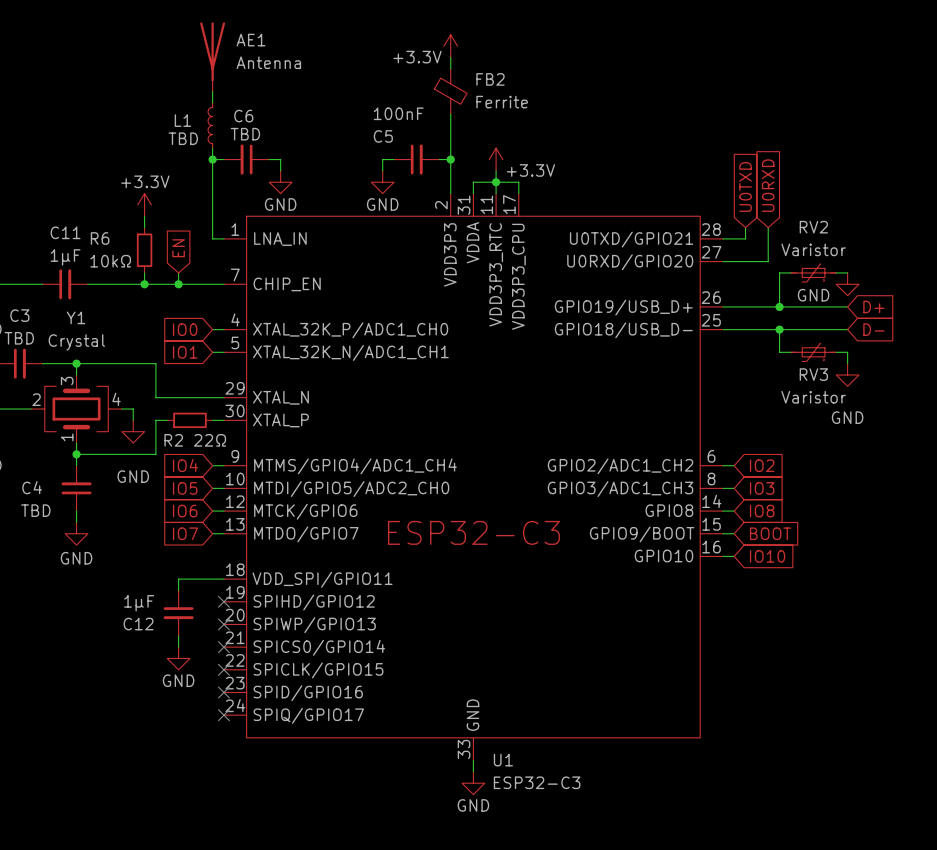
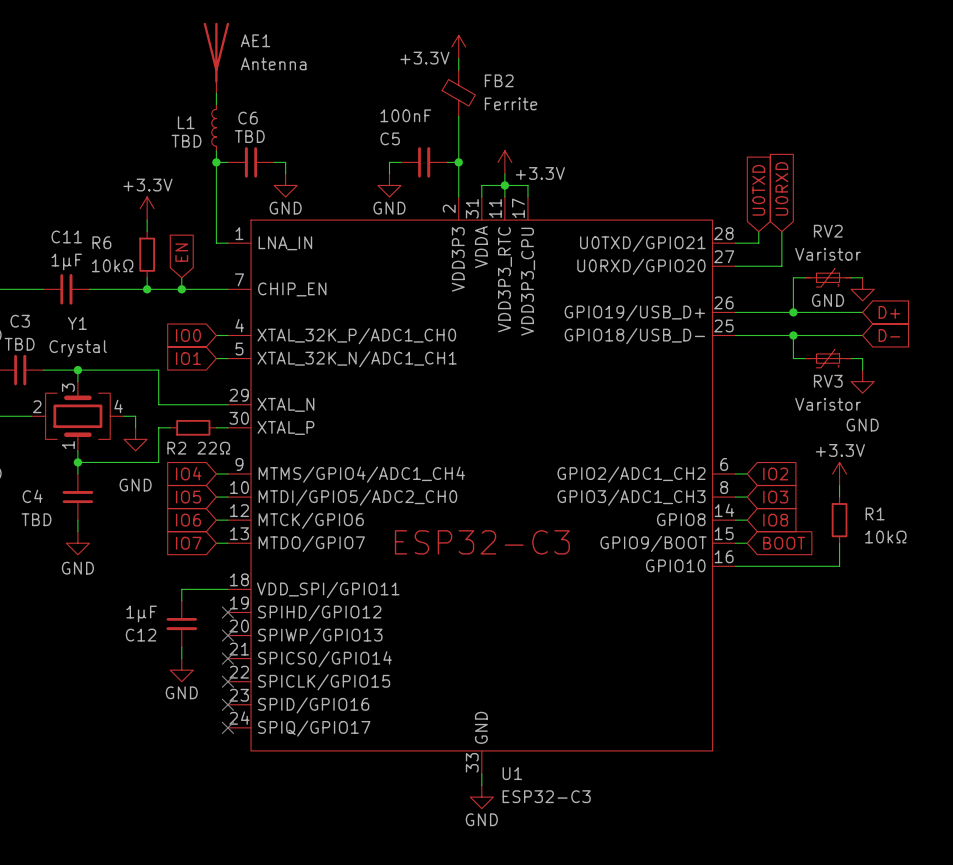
power symbol: none -> +3.3V (839, 473)
wire: none -> (839, 485) (839, 497)
R1: none -> 10kΩ (839, 520)
wire: none -> (839, 543) (839, 566) (747, 566)
global label: IO10 (767, 556) -> none

